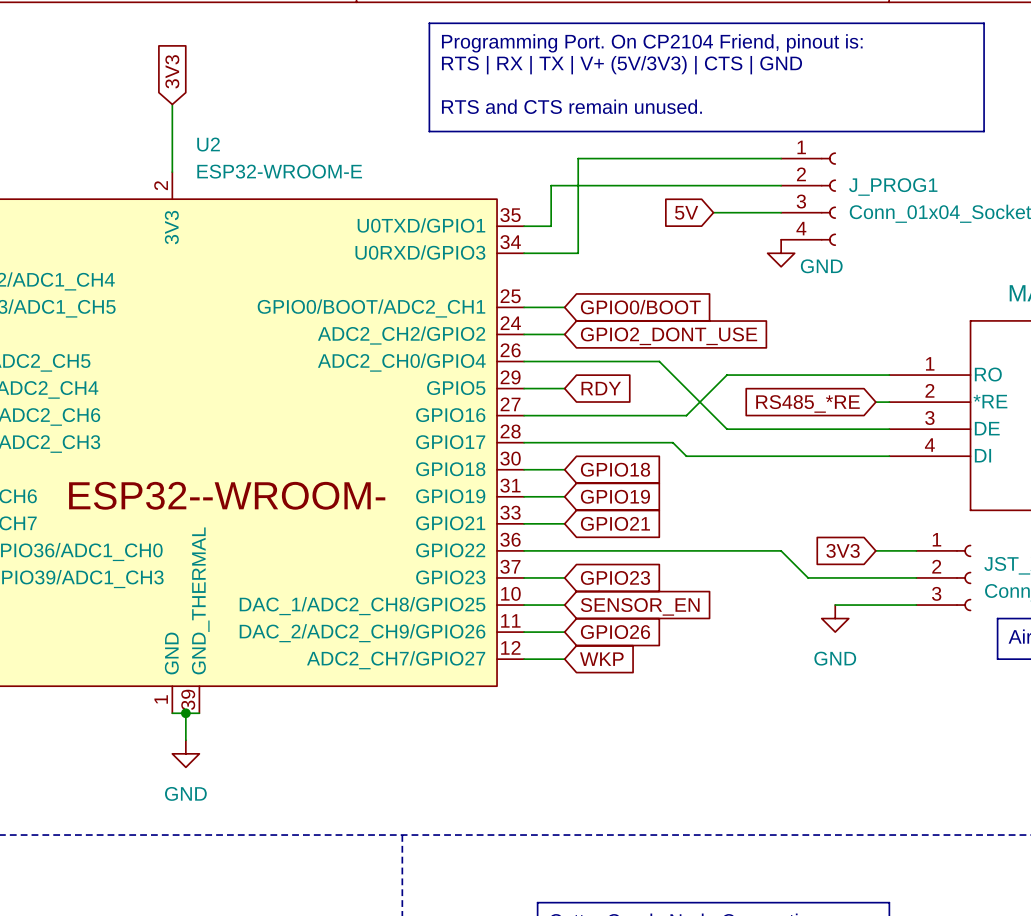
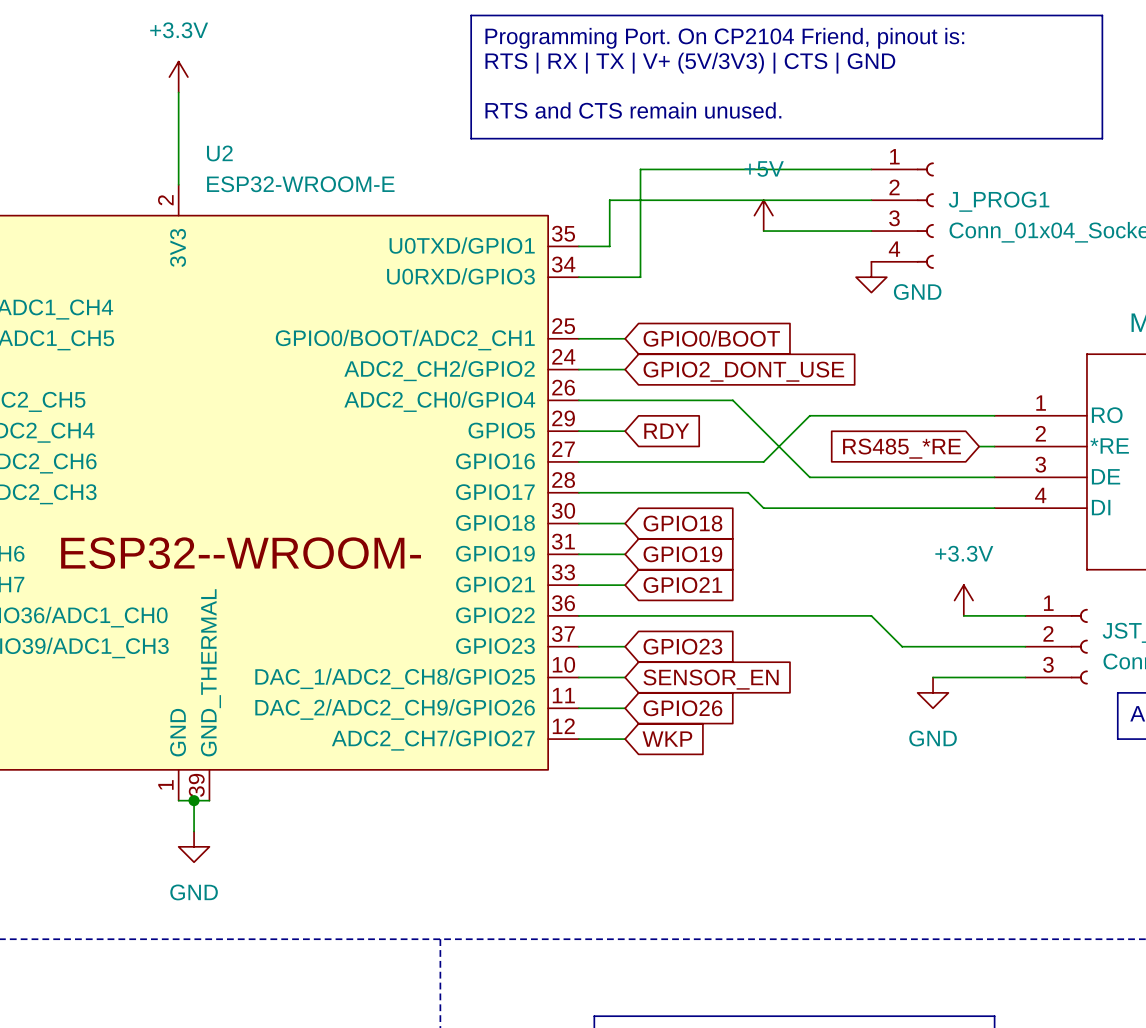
global label: 3V3 (172, 71) -> none
power symbol: none -> +3.3V (178, 77)
wire: none -> (178, 92) (178, 107)
power symbol: none -> +5V (763, 215)
wire: none -> (763, 231) (794, 231)
global label: 5V (686, 212) -> none
power symbol: none -> +3.3V (963, 600)
global label: 3V3 (843, 550) -> none
wire: none -> (963, 615) (979, 615)

